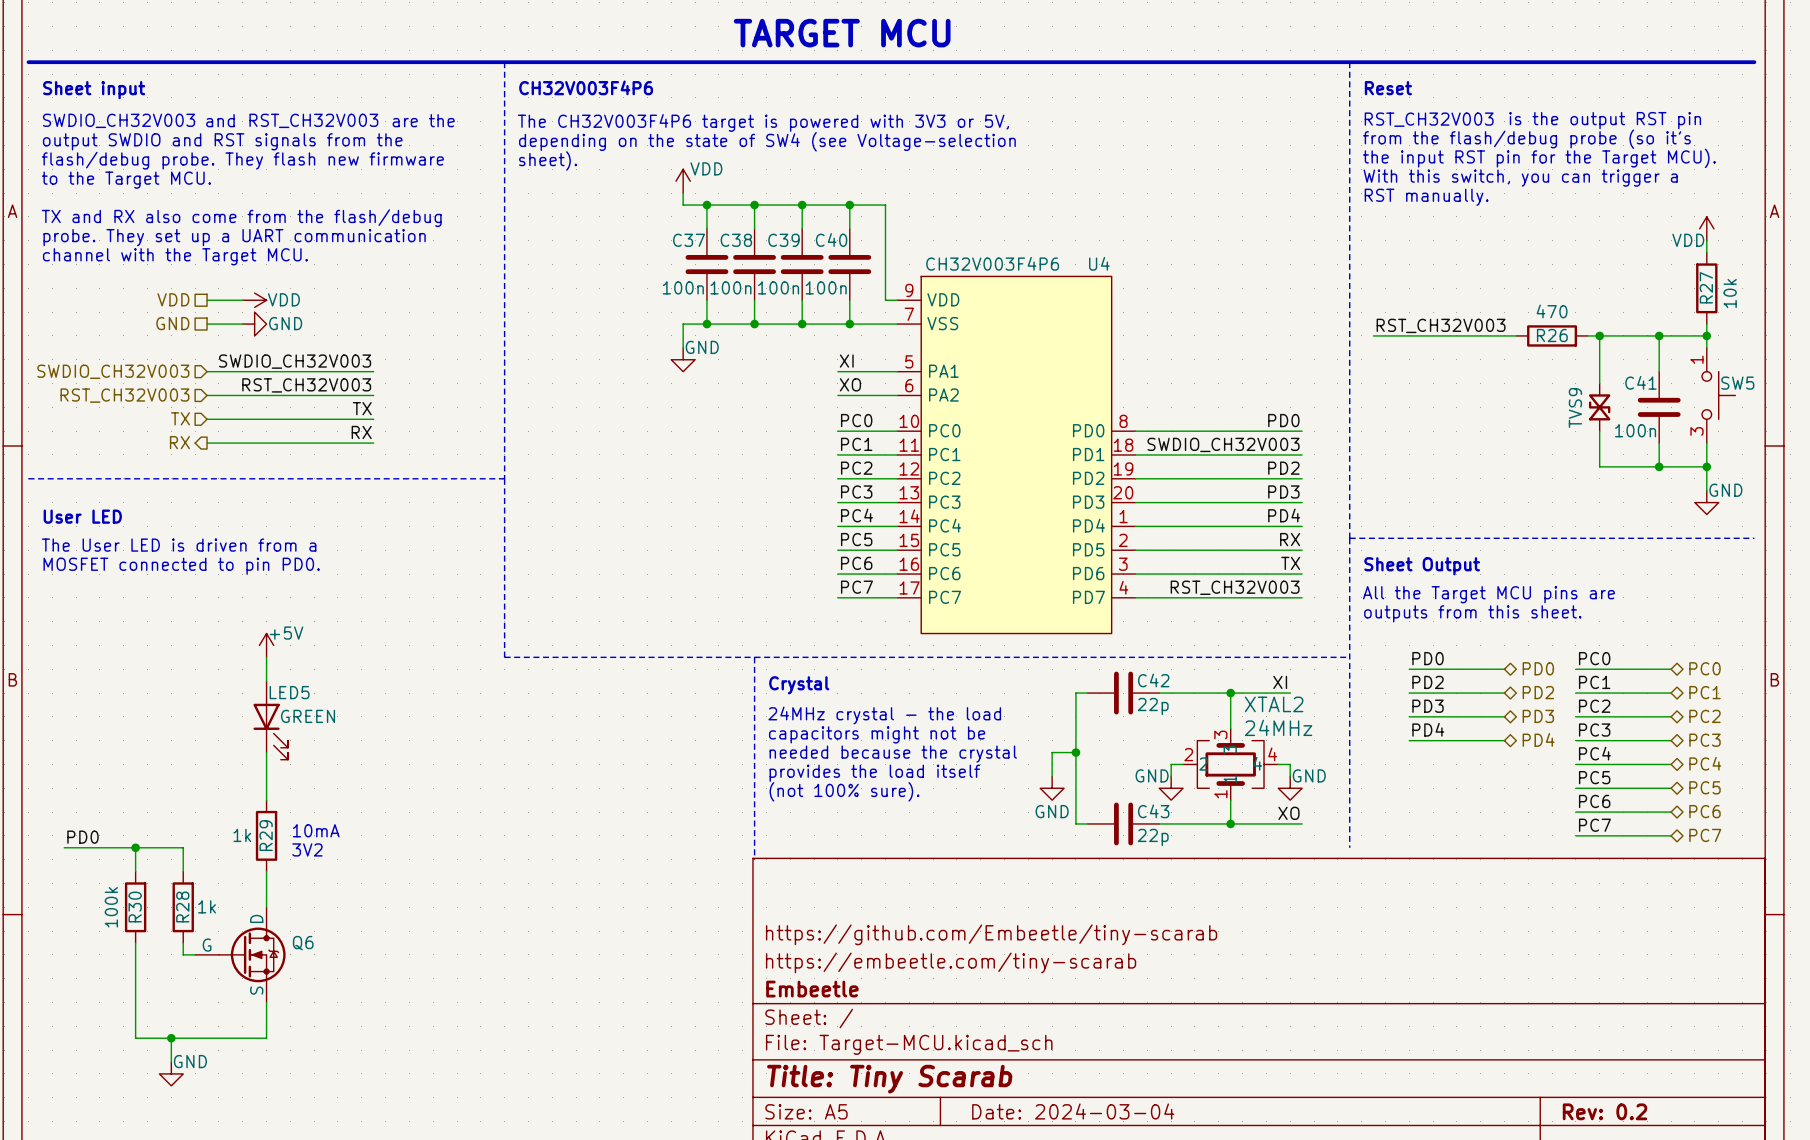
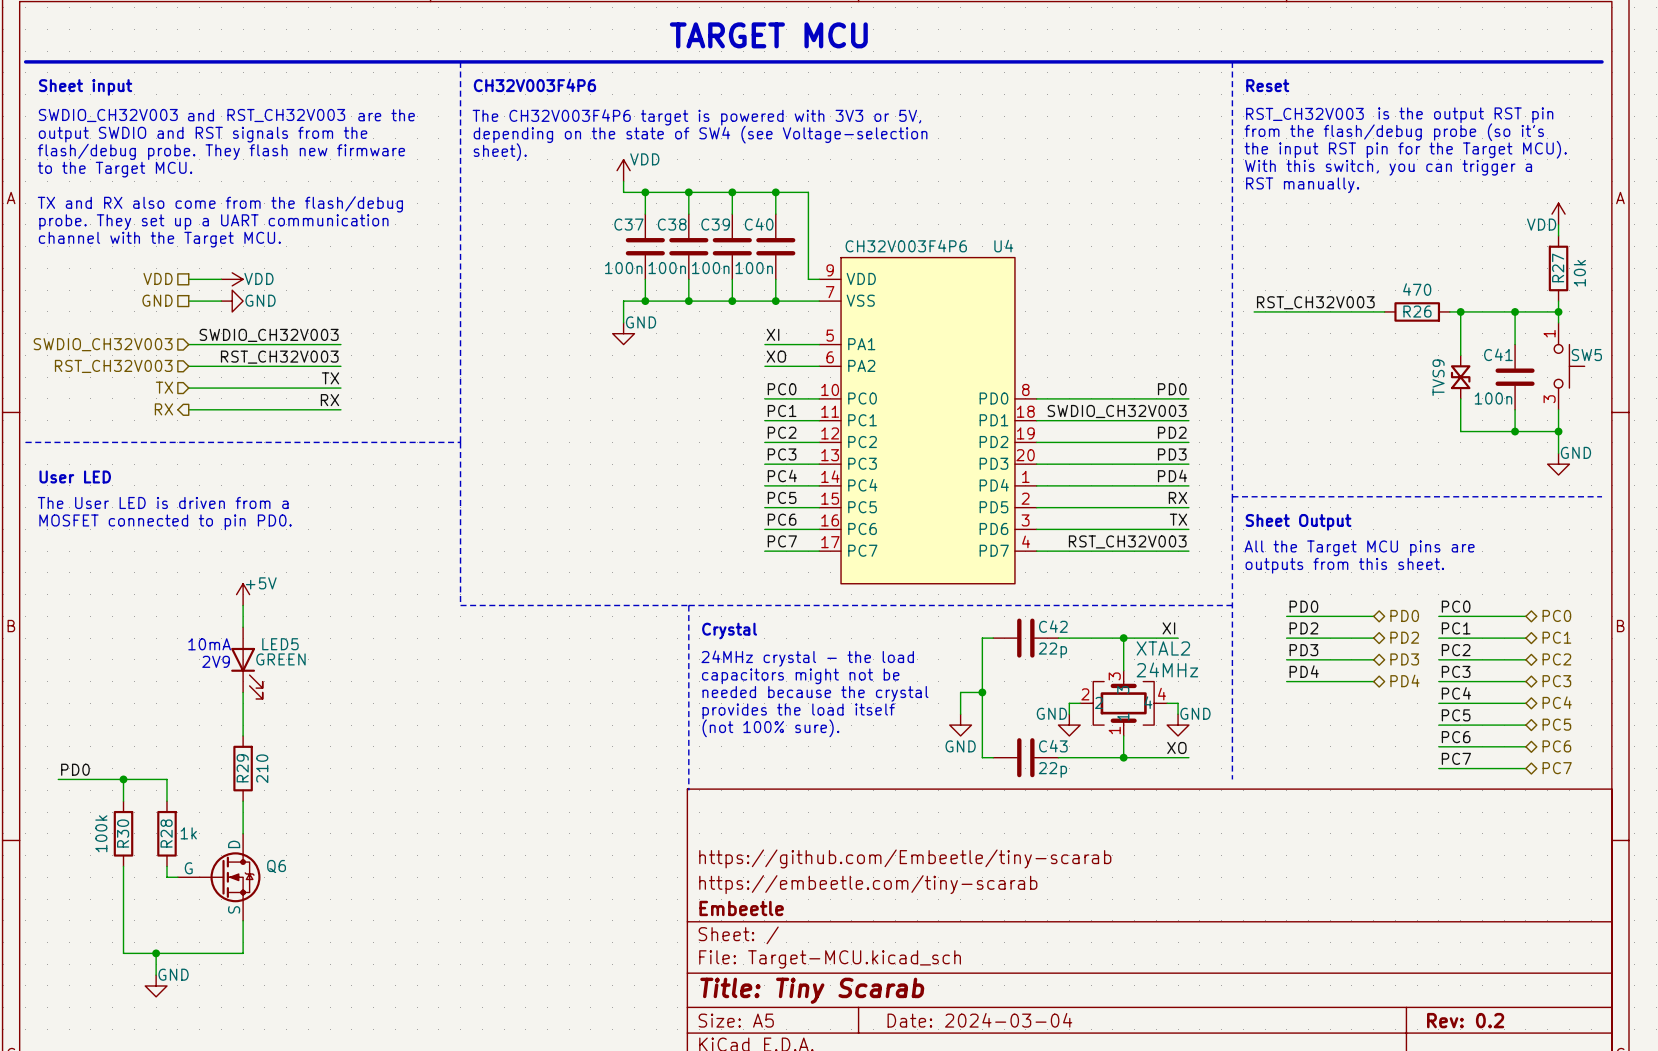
LED5 name position: LED5 (289, 692) -> LED5 (280, 644)
text: none -> 2V9 (216, 661)
text position: 10mA (316, 830) -> 10mA (209, 644)
R29 value: 1k (242, 835) -> 210 (262, 768)
text: 3V2 (307, 849) -> none

